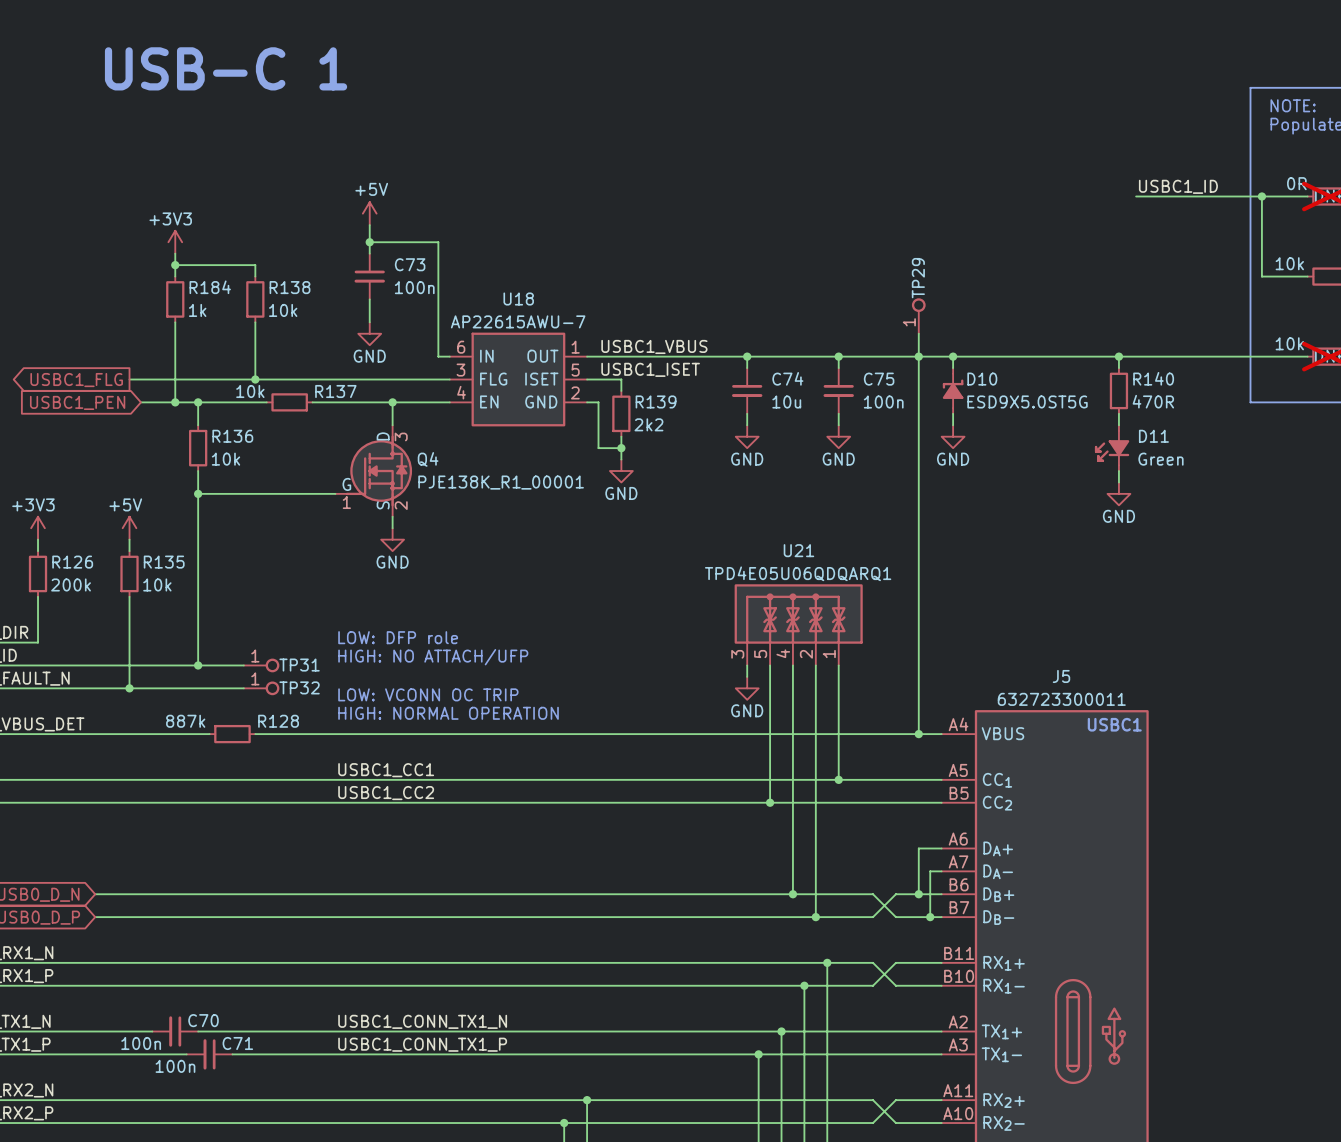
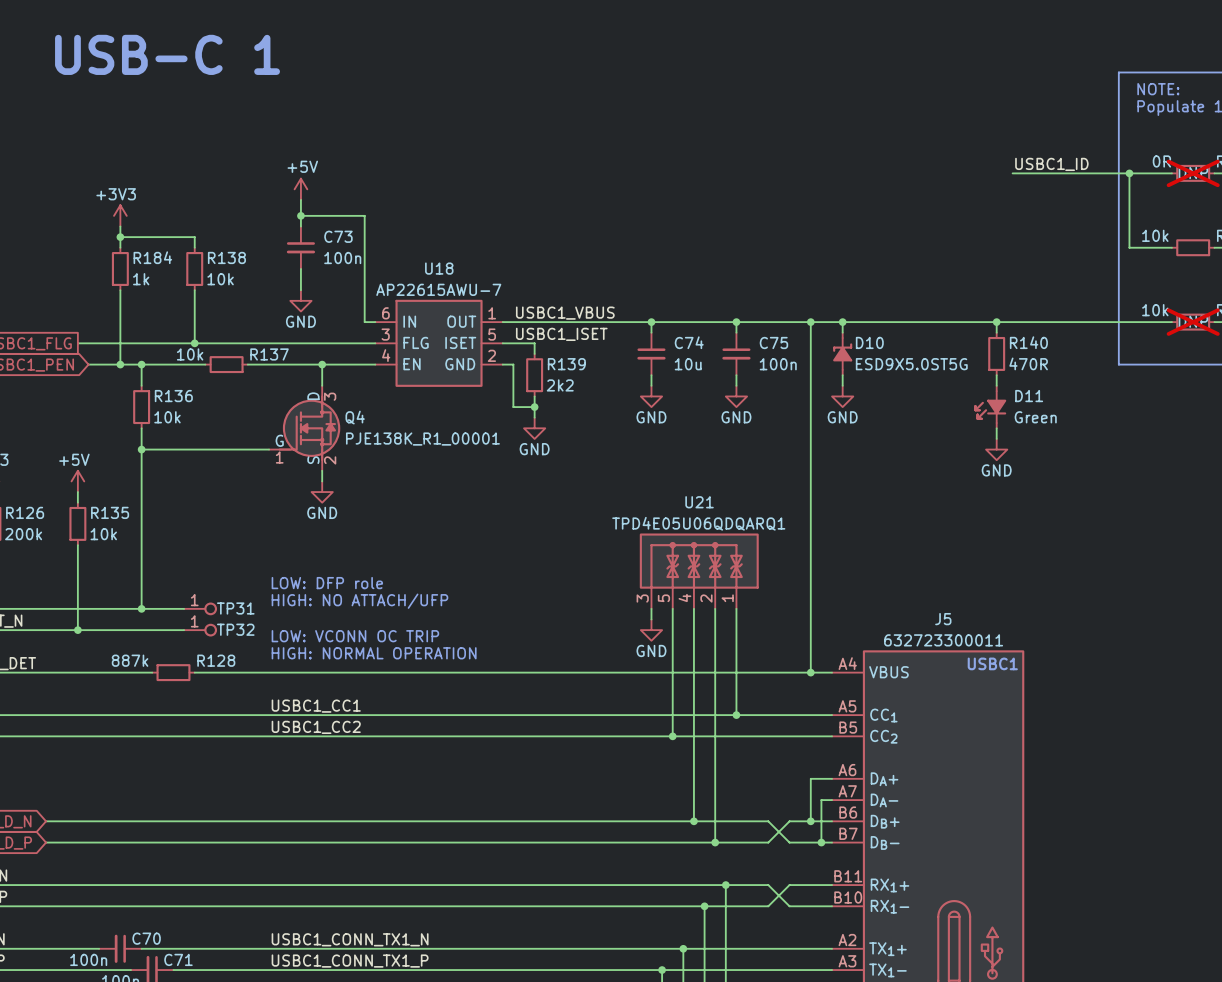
TP29: (918, 316) -> none
wire: (918, 333) (918, 356) -> none

